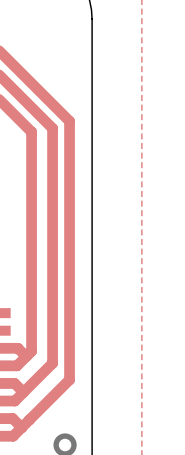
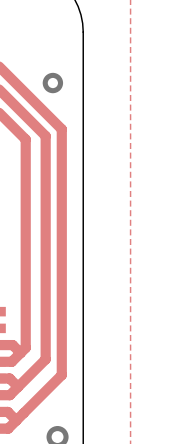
via: none -> (52, 83)

